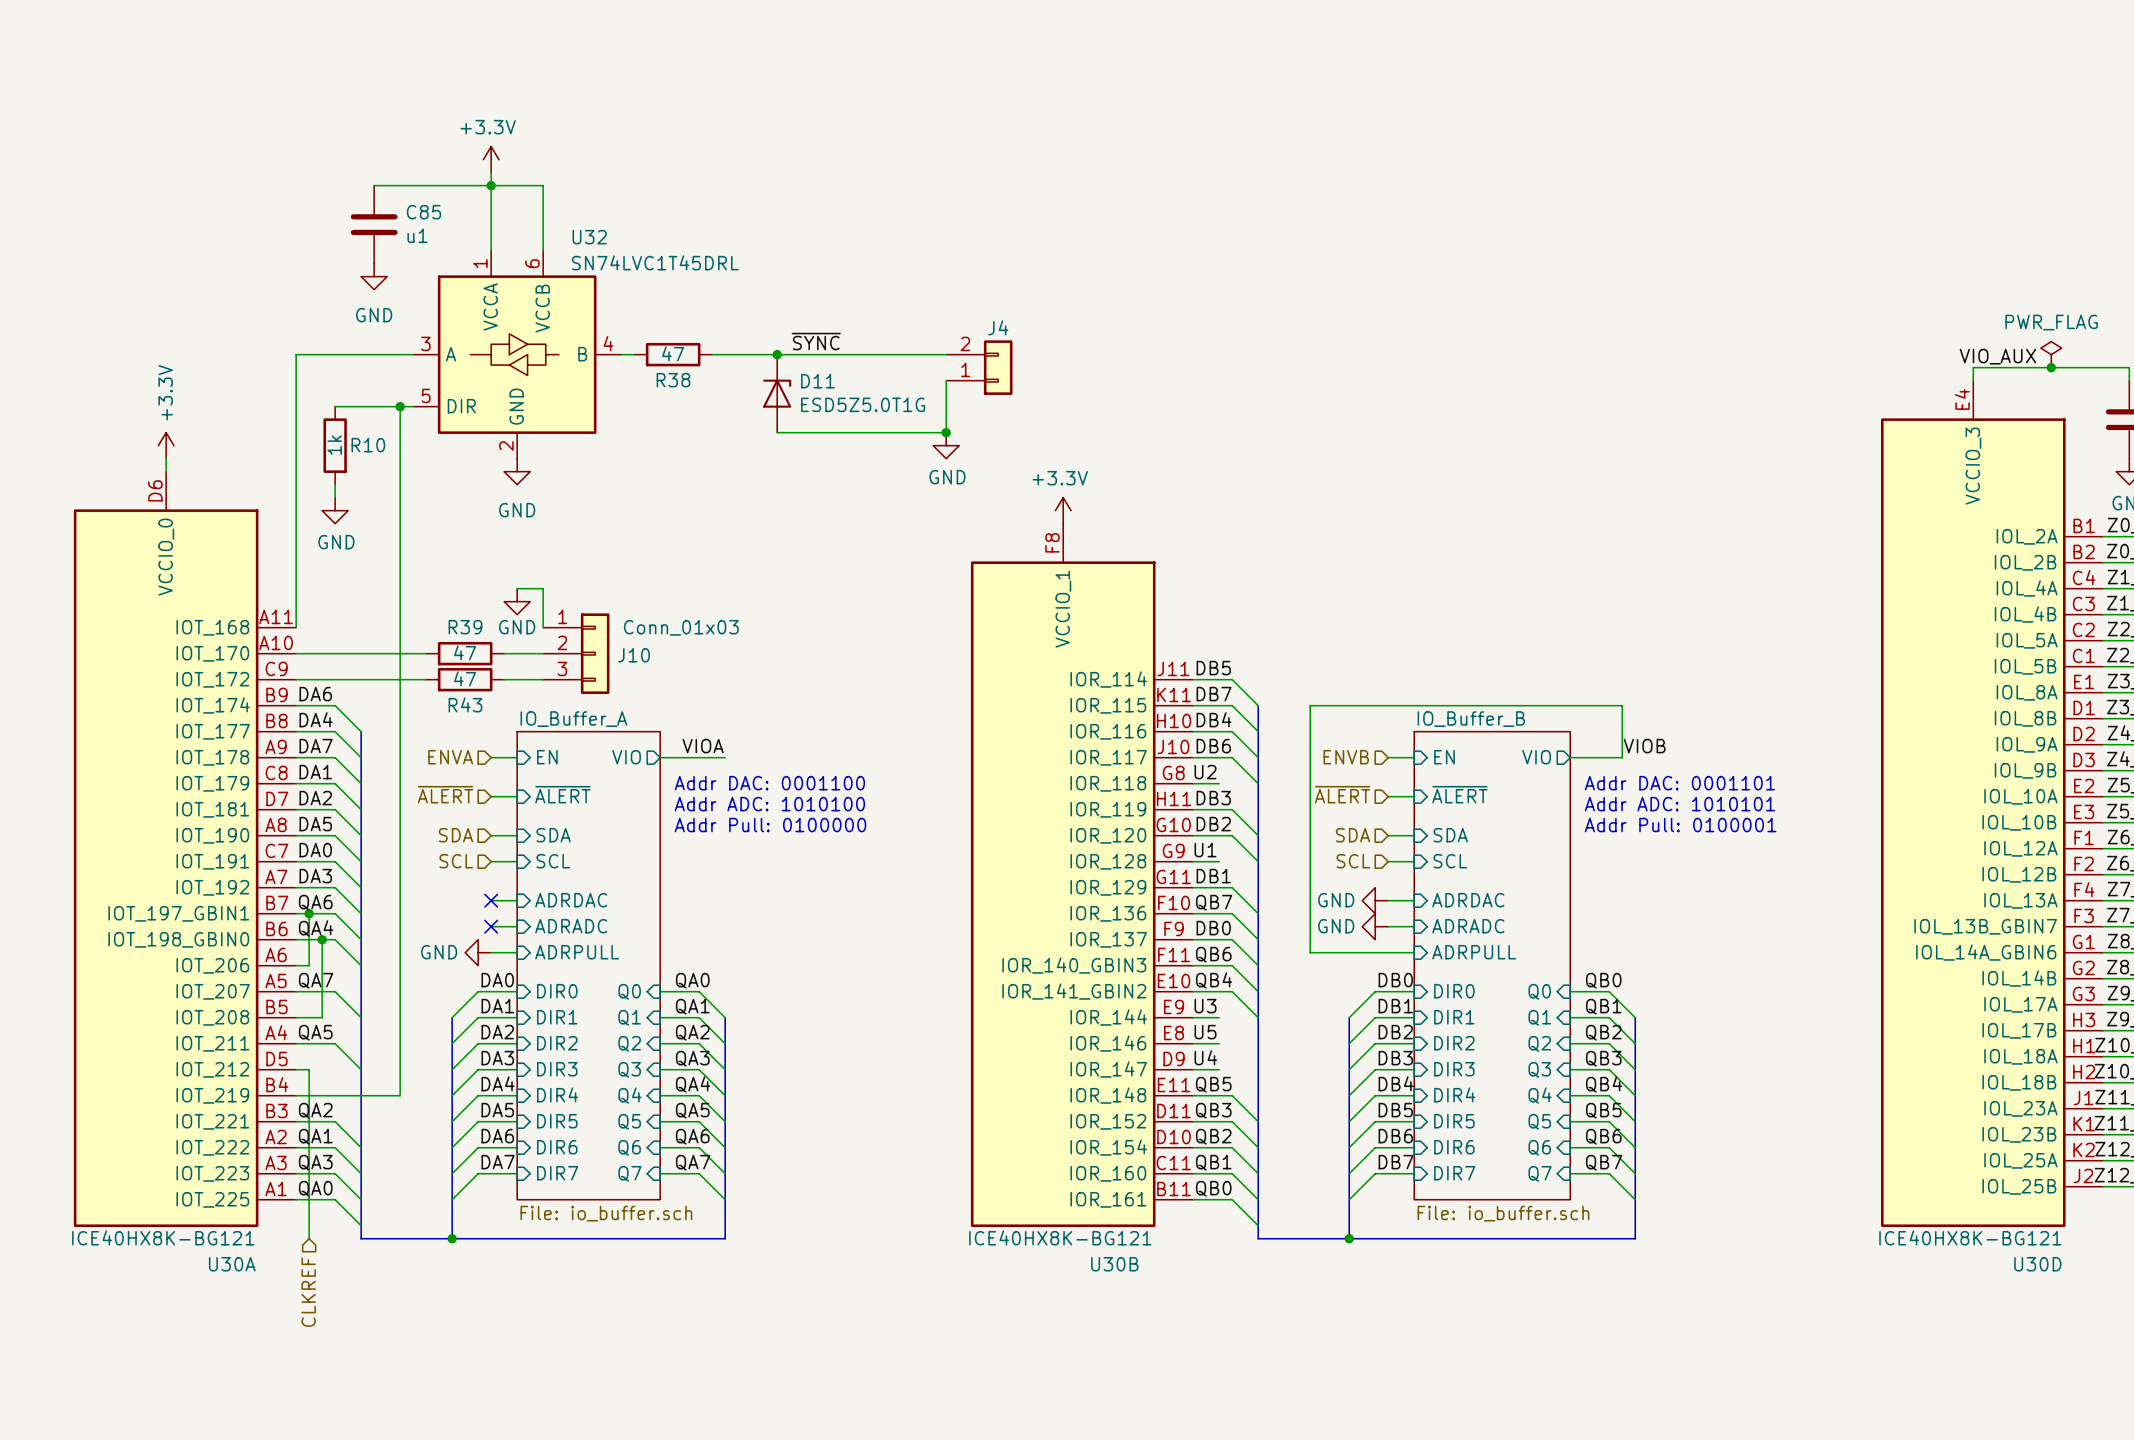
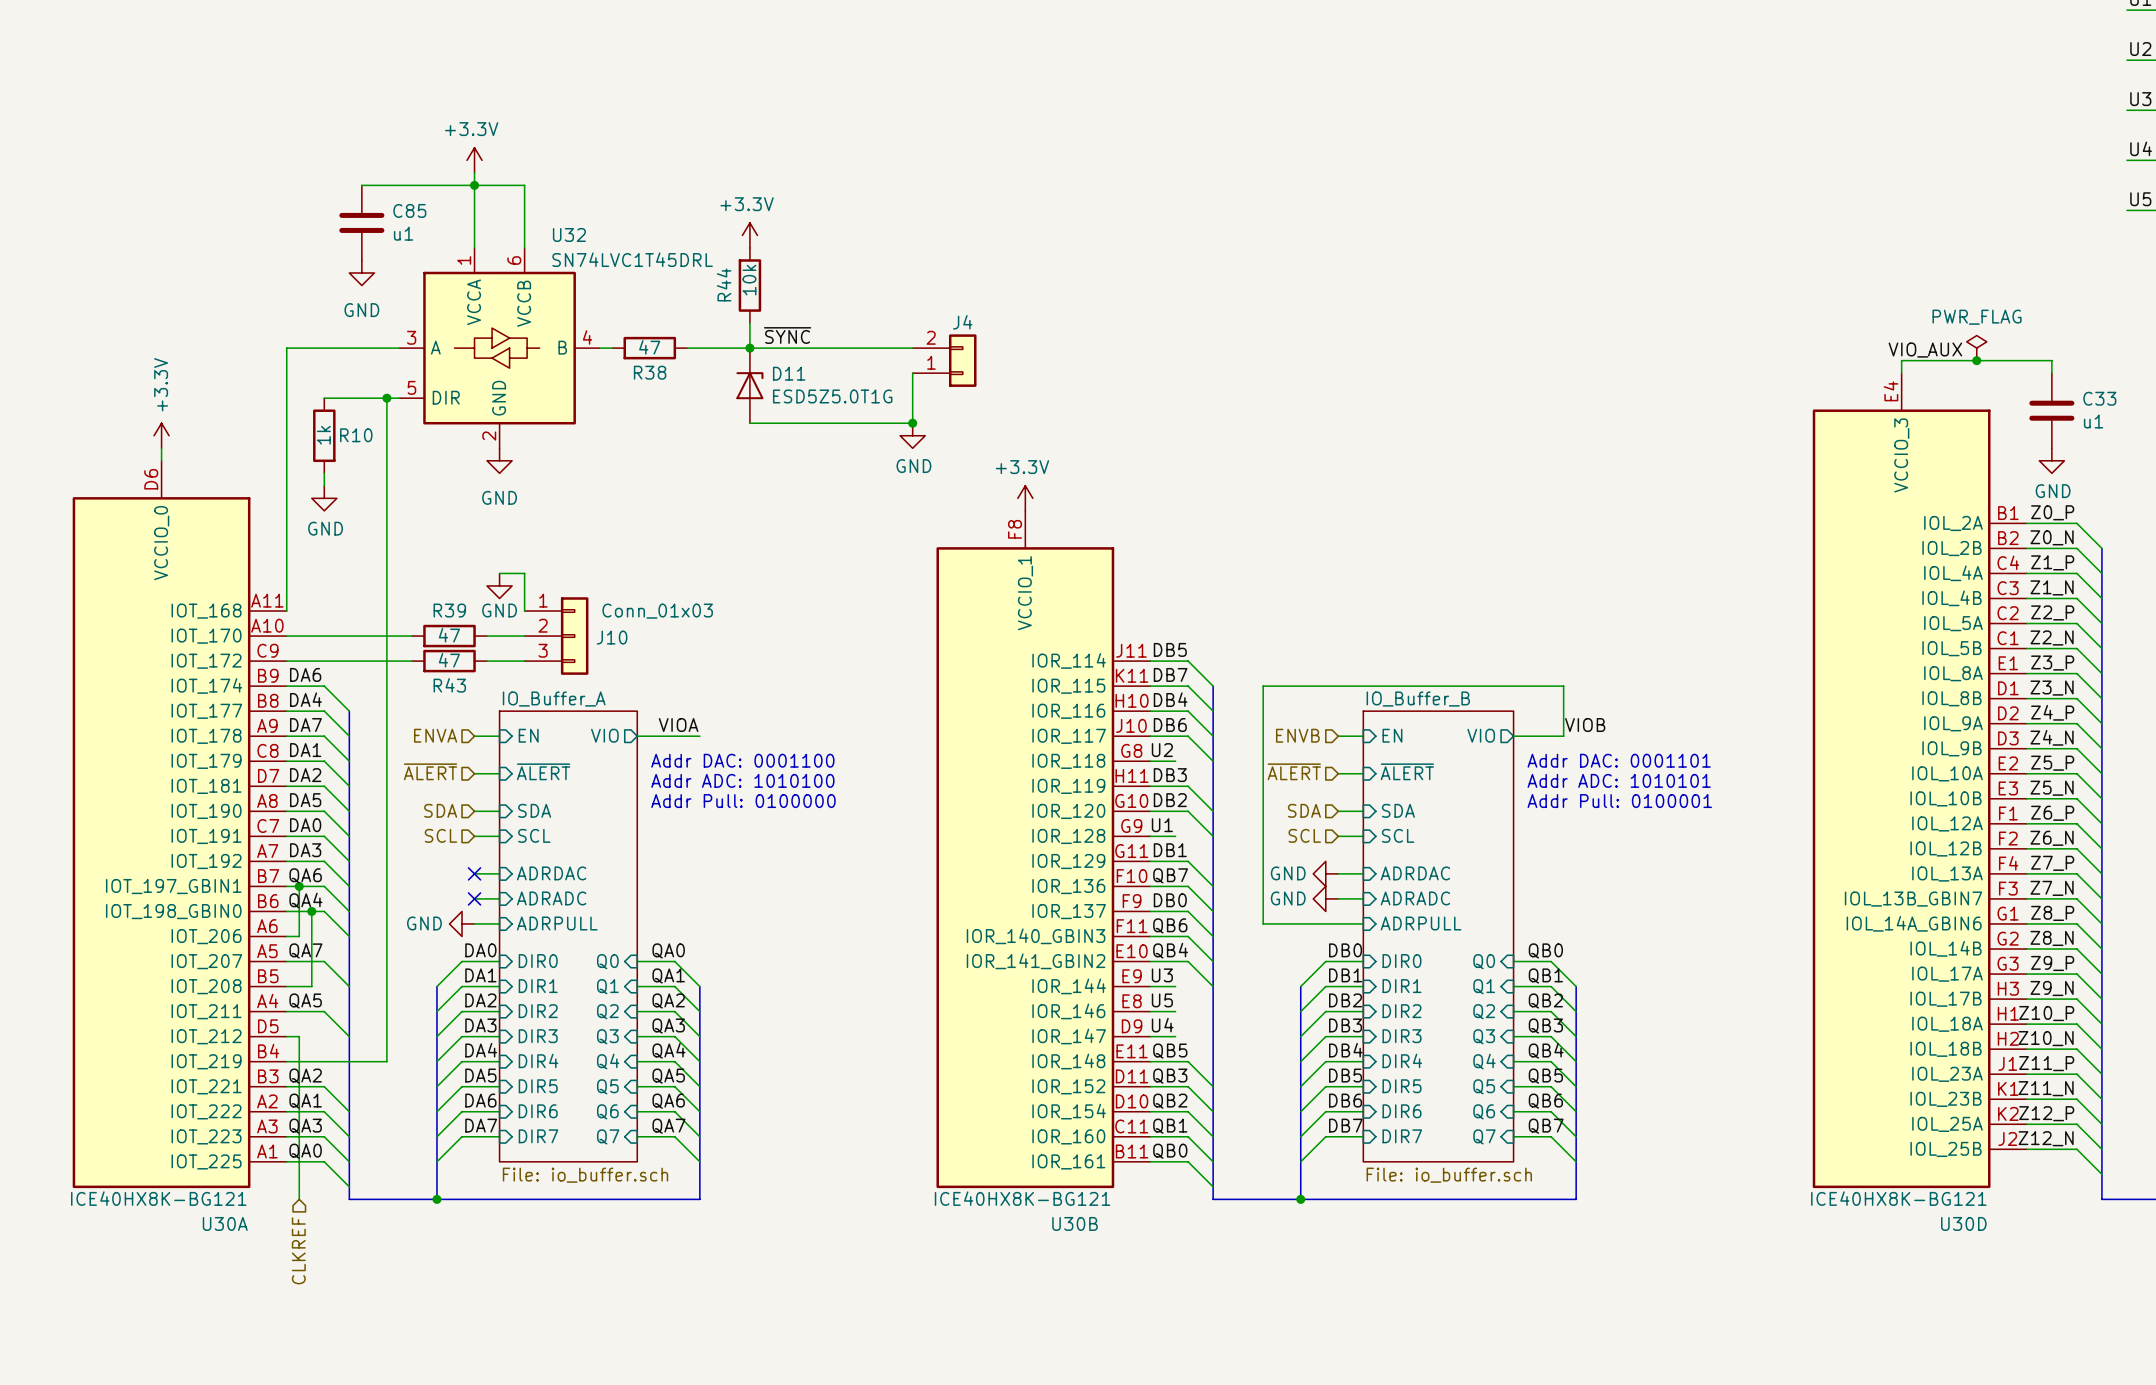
power symbol: none -> +3.3V (749, 235)
R44: none -> 10k (749, 285)
wire: none -> (749, 323) (749, 348)

